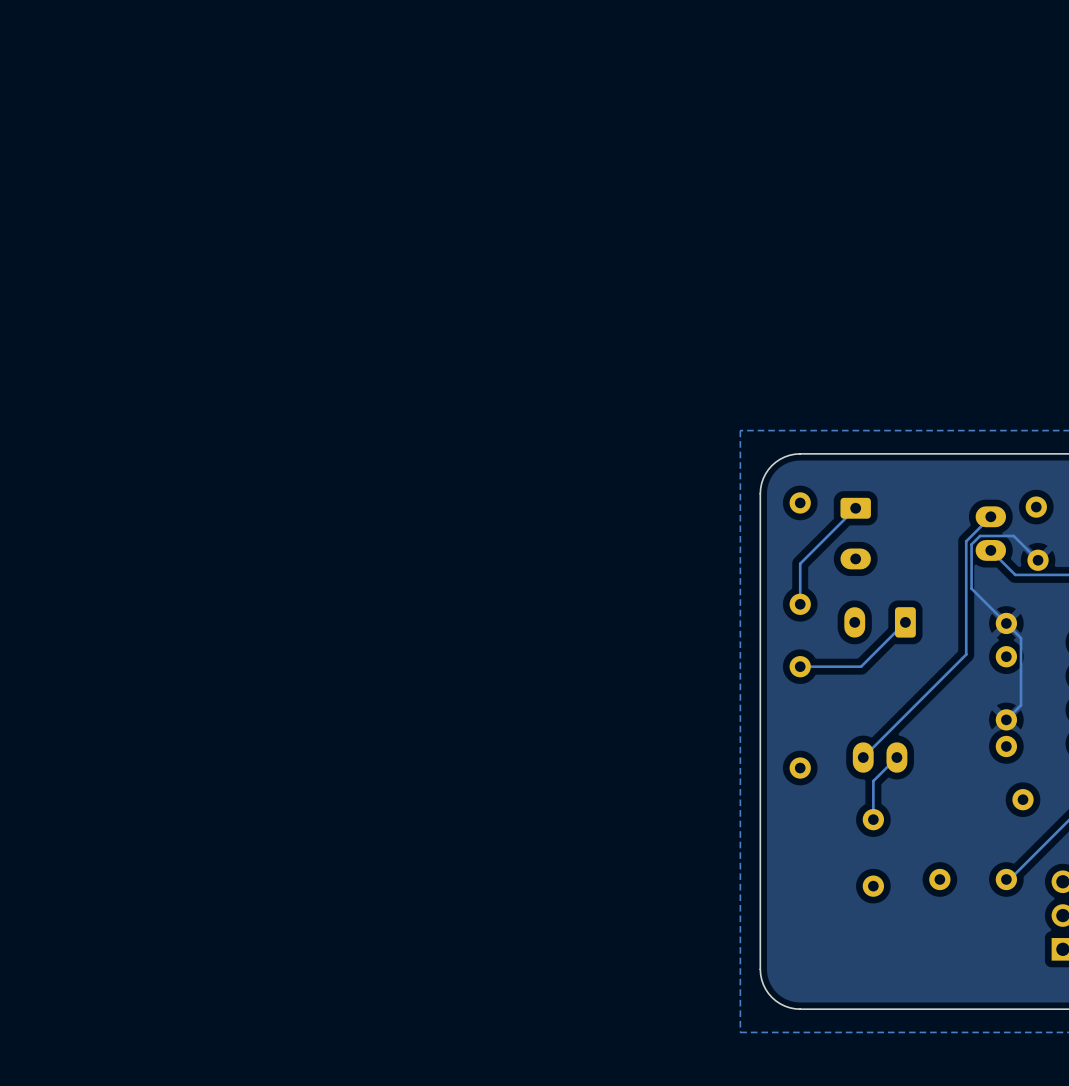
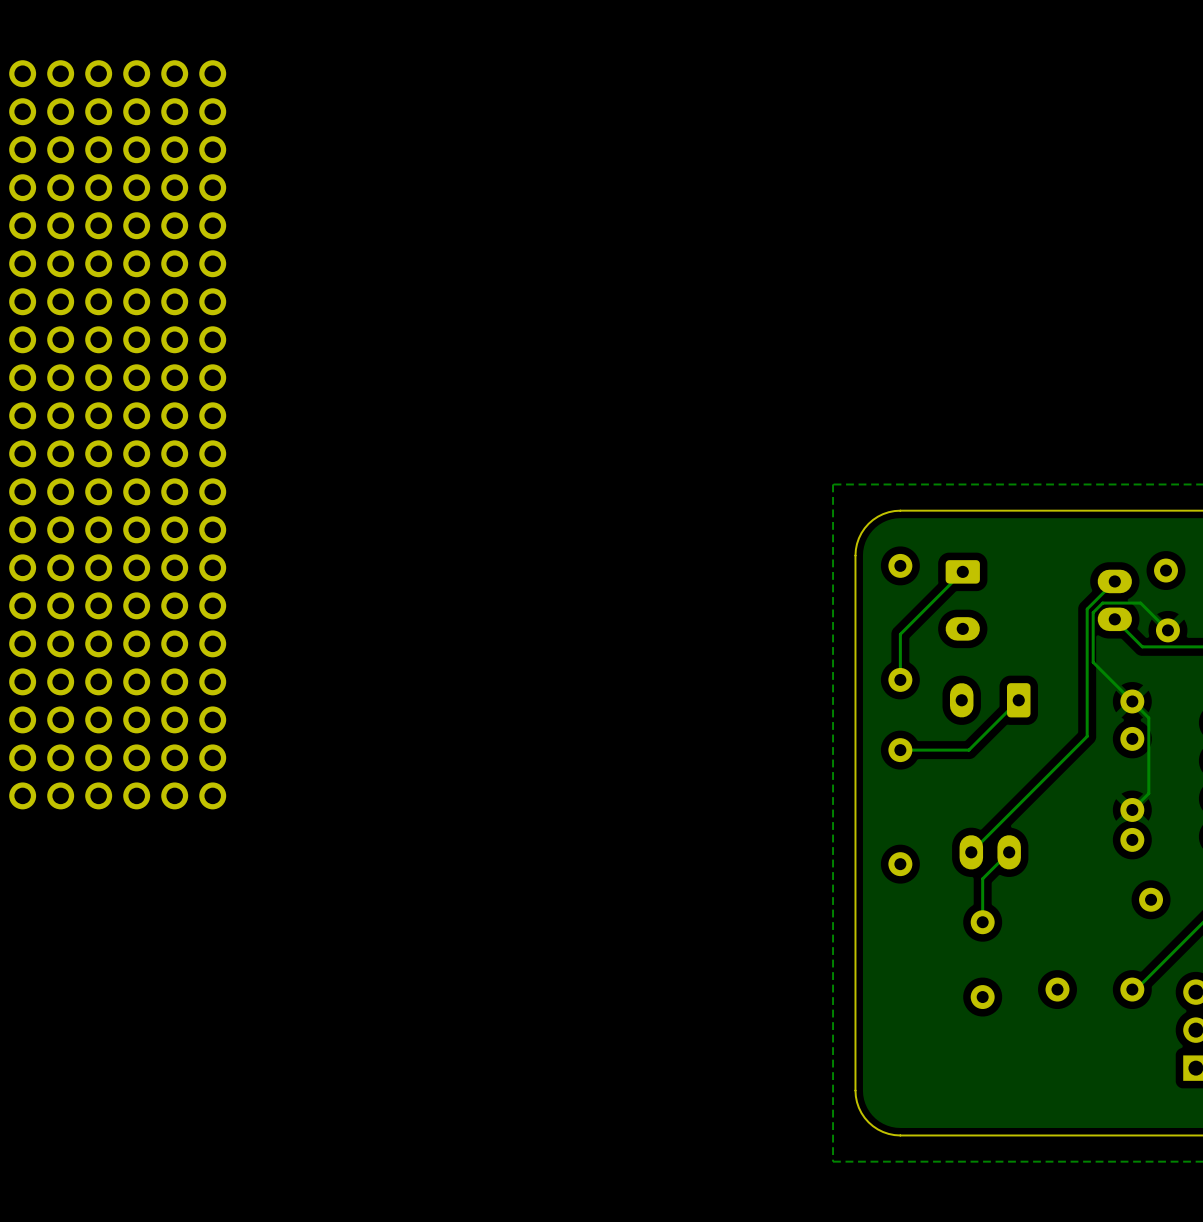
part: none -> (22, 73)
part: none -> (60, 73)
part: none -> (98, 73)
part: none -> (136, 73)
part: none -> (174, 73)
part: none -> (212, 73)
part: none -> (22, 111)
part: none -> (60, 111)
part: none -> (98, 111)
part: none -> (136, 111)
part: none -> (174, 111)
part: none -> (212, 111)
part: none -> (22, 149)
part: none -> (60, 149)
part: none -> (98, 149)
part: none -> (136, 149)
part: none -> (174, 149)
part: none -> (212, 149)
part: none -> (22, 187)
part: none -> (60, 187)
part: none -> (98, 187)
part: none -> (136, 187)
part: none -> (174, 187)
part: none -> (212, 187)
part: none -> (22, 225)
part: none -> (60, 225)
part: none -> (98, 225)
part: none -> (136, 225)
part: none -> (174, 225)
part: none -> (212, 225)
part: none -> (22, 263)
part: none -> (60, 263)
part: none -> (98, 263)
part: none -> (136, 263)
part: none -> (174, 263)
part: none -> (212, 263)
part: none -> (22, 301)
part: none -> (60, 301)
part: none -> (98, 301)
part: none -> (136, 301)
part: none -> (174, 301)
part: none -> (212, 301)
part: none -> (22, 339)
part: none -> (60, 339)
part: none -> (98, 339)
part: none -> (136, 339)
part: none -> (174, 339)
part: none -> (212, 339)
part: none -> (22, 377)
part: none -> (60, 377)
part: none -> (98, 377)
part: none -> (136, 377)
part: none -> (174, 377)
part: none -> (212, 377)
part: none -> (22, 415)
part: none -> (60, 415)
part: none -> (98, 415)
part: none -> (136, 415)
part: none -> (174, 415)
part: none -> (212, 415)
part: none -> (22, 453)
part: none -> (60, 453)
part: none -> (98, 453)
part: none -> (136, 453)
part: none -> (174, 453)
part: none -> (212, 453)
part: none -> (22, 491)
part: none -> (60, 491)
part: none -> (98, 491)
part: none -> (136, 491)
part: none -> (174, 491)
part: none -> (212, 491)
part: none -> (22, 529)
part: none -> (60, 529)
part: none -> (98, 529)
part: none -> (136, 529)
part: none -> (174, 529)
part: none -> (212, 529)
part: none -> (22, 567)
part: none -> (60, 567)
part: none -> (98, 567)
part: none -> (136, 567)
part: none -> (174, 567)
part: none -> (212, 567)
part: none -> (22, 605)
part: none -> (60, 605)
part: none -> (98, 605)
part: none -> (136, 605)
part: none -> (174, 605)
part: none -> (212, 605)
part: none -> (22, 643)
part: none -> (60, 643)
part: none -> (98, 643)
part: none -> (136, 643)
part: none -> (174, 643)
part: none -> (212, 643)
part: none -> (22, 681)
part: none -> (60, 681)
part: none -> (98, 681)
part: none -> (136, 681)
part: none -> (174, 681)
part: none -> (212, 681)
part: none -> (22, 719)
part: none -> (60, 719)
part: none -> (98, 719)
part: none -> (136, 719)
part: none -> (174, 719)
part: none -> (212, 719)
part: none -> (22, 757)
part: none -> (60, 757)
part: none -> (98, 757)
part: none -> (136, 757)
part: none -> (174, 757)
part: none -> (212, 757)
part: none -> (22, 795)
part: none -> (60, 795)
part: none -> (98, 795)
part: none -> (136, 795)
part: none -> (174, 795)
part: none -> (212, 795)

